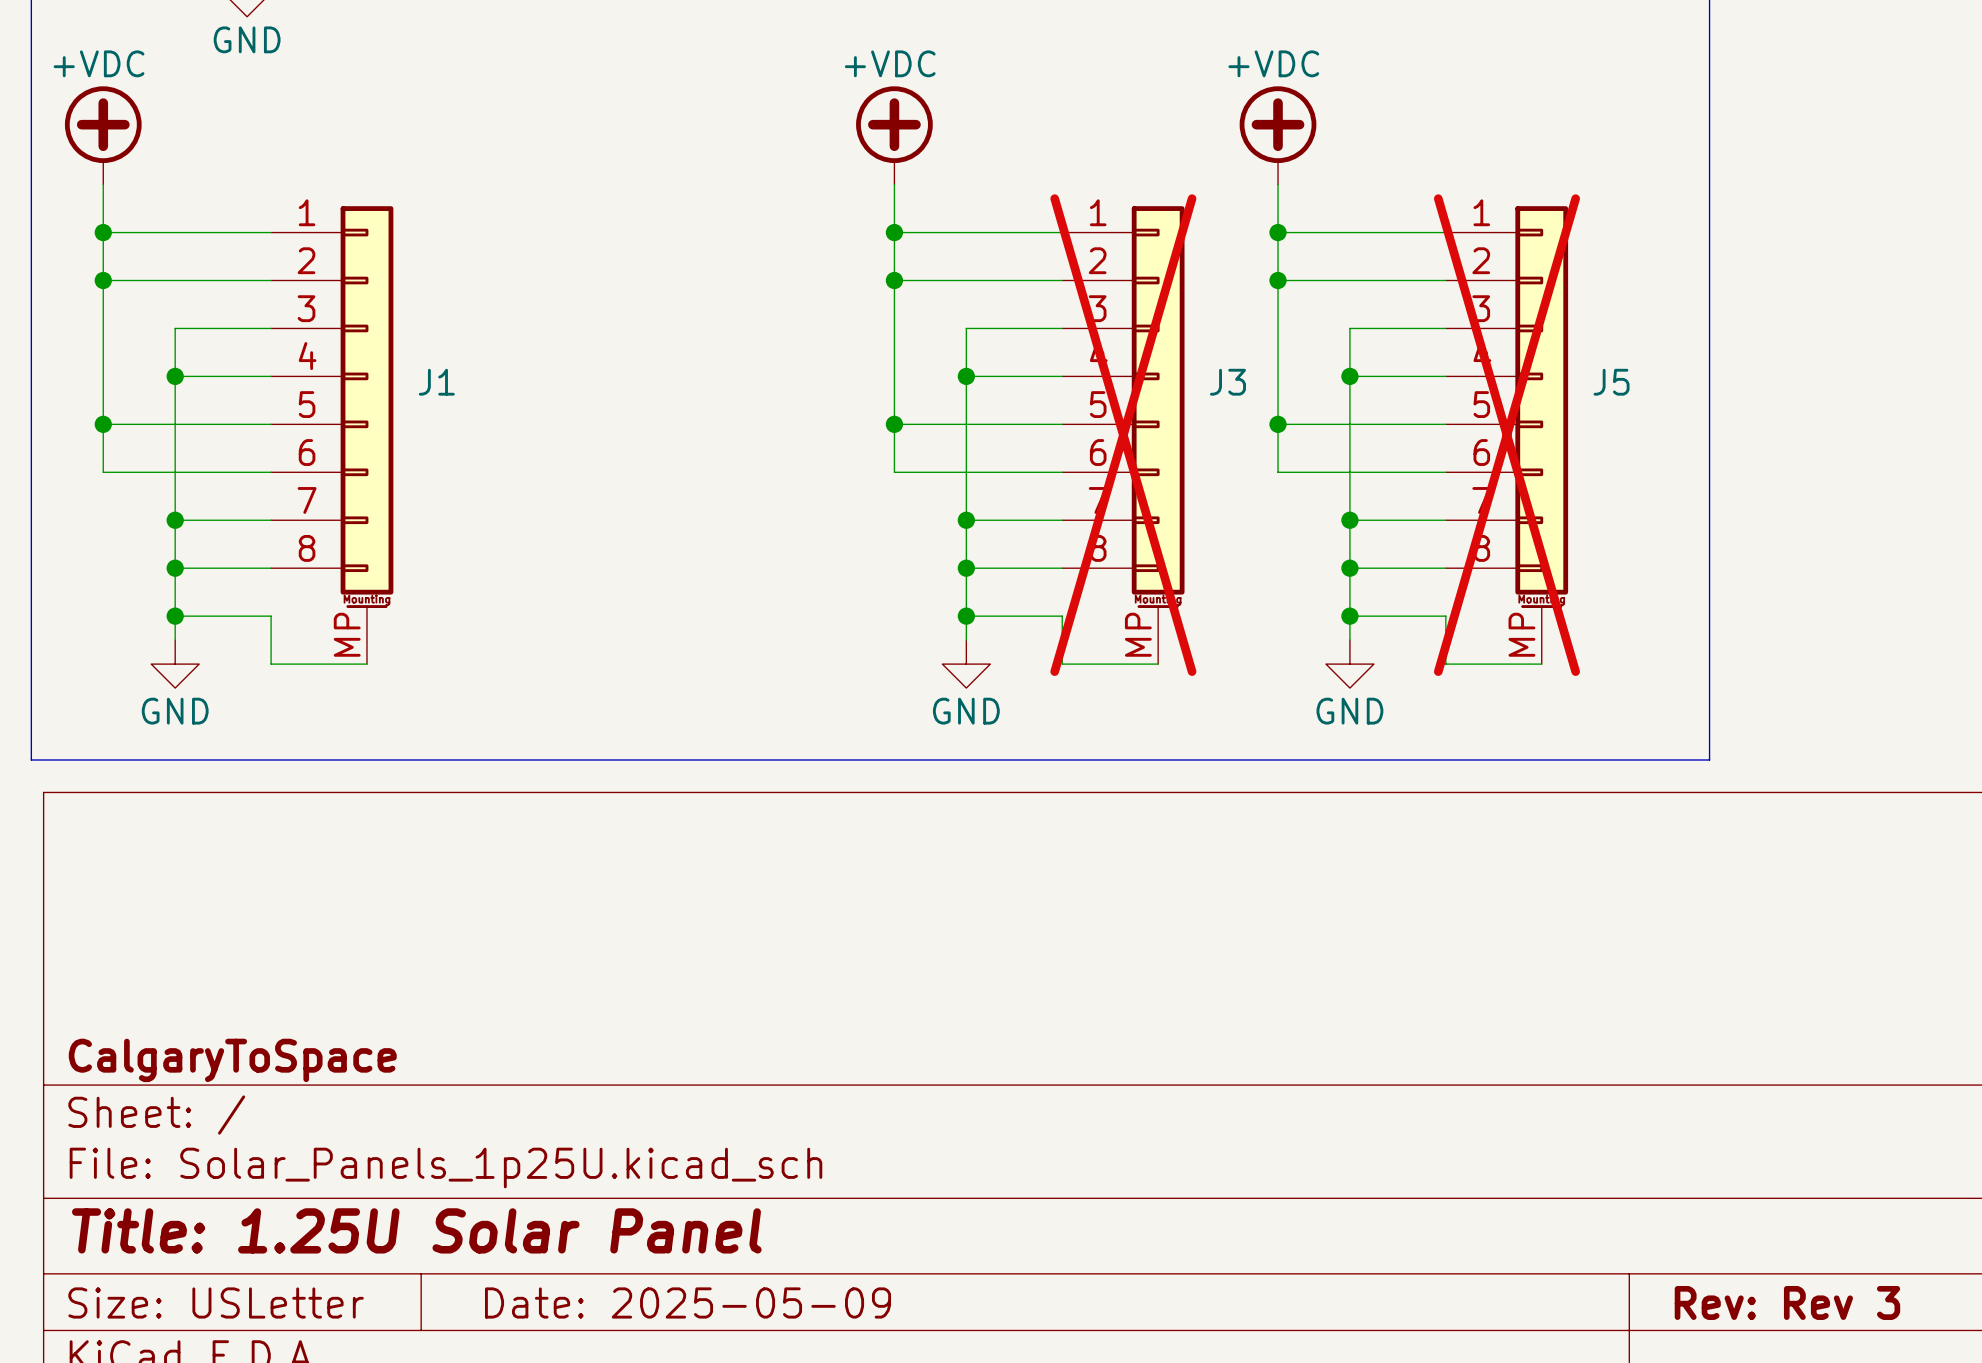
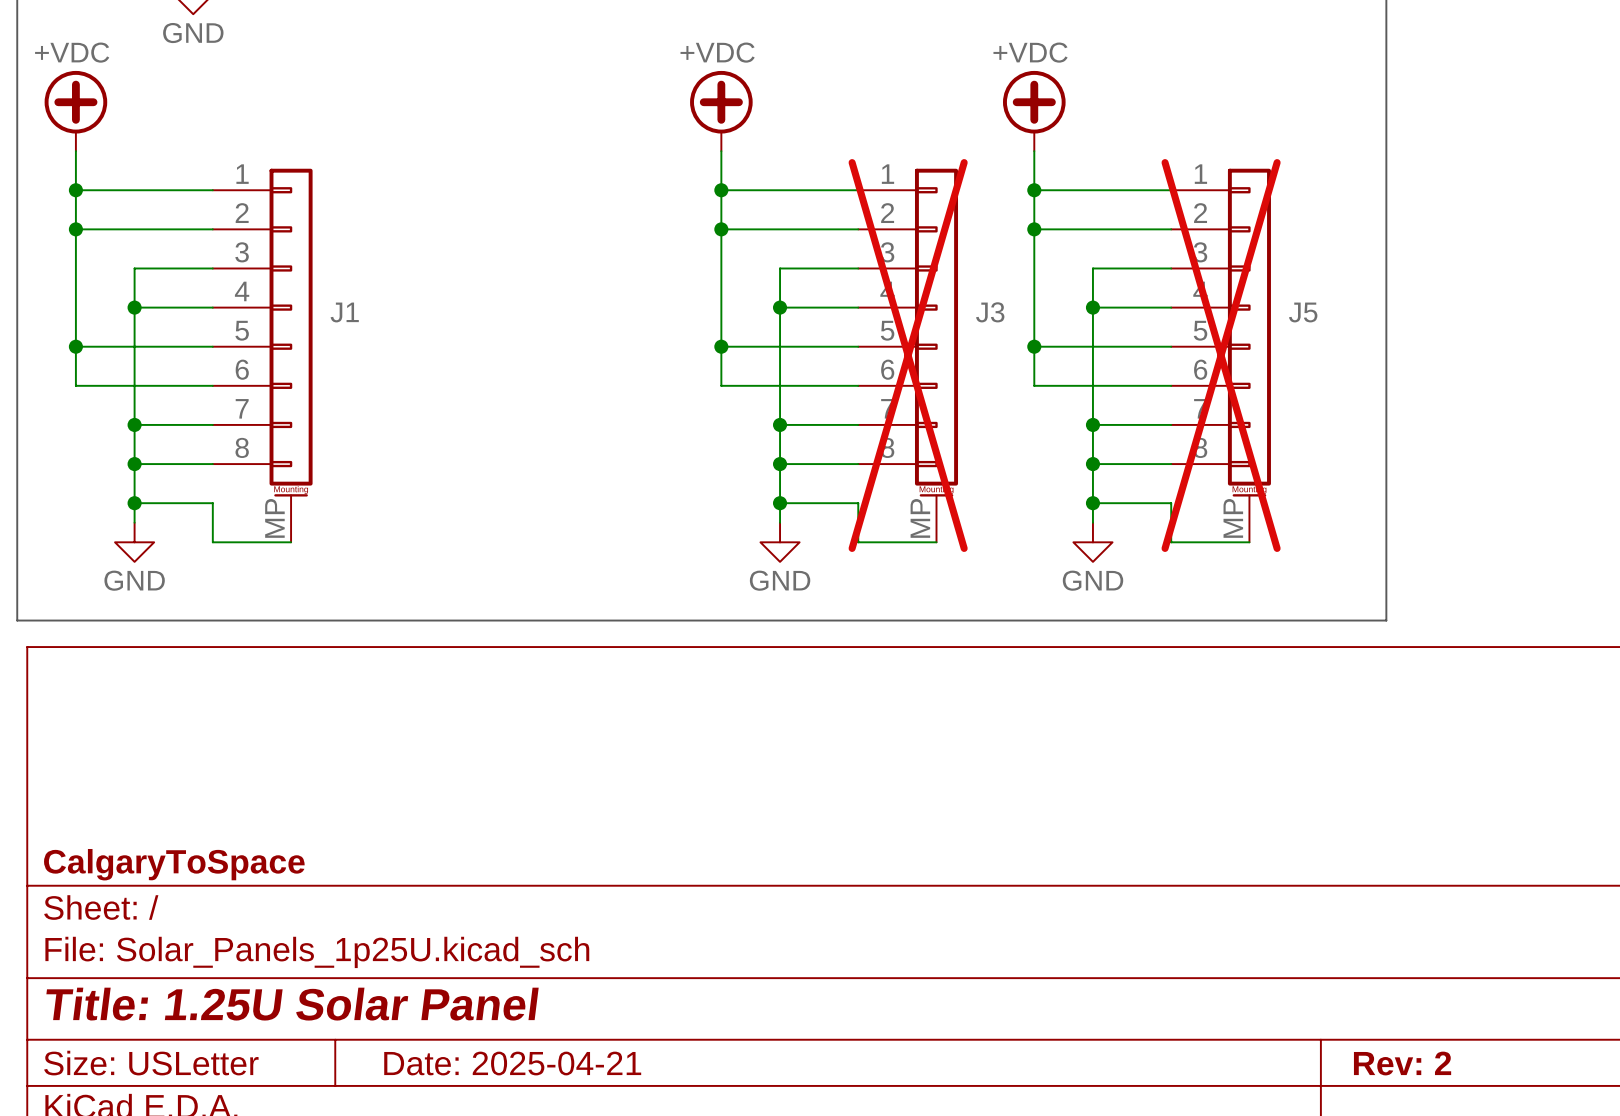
title block: Date: 2025-05-09 (688, 1302) -> Date: 2025-04-21 (512, 1063)
title block: Rev: Rev 3 (1787, 1302) -> Rev: 2 (1402, 1063)

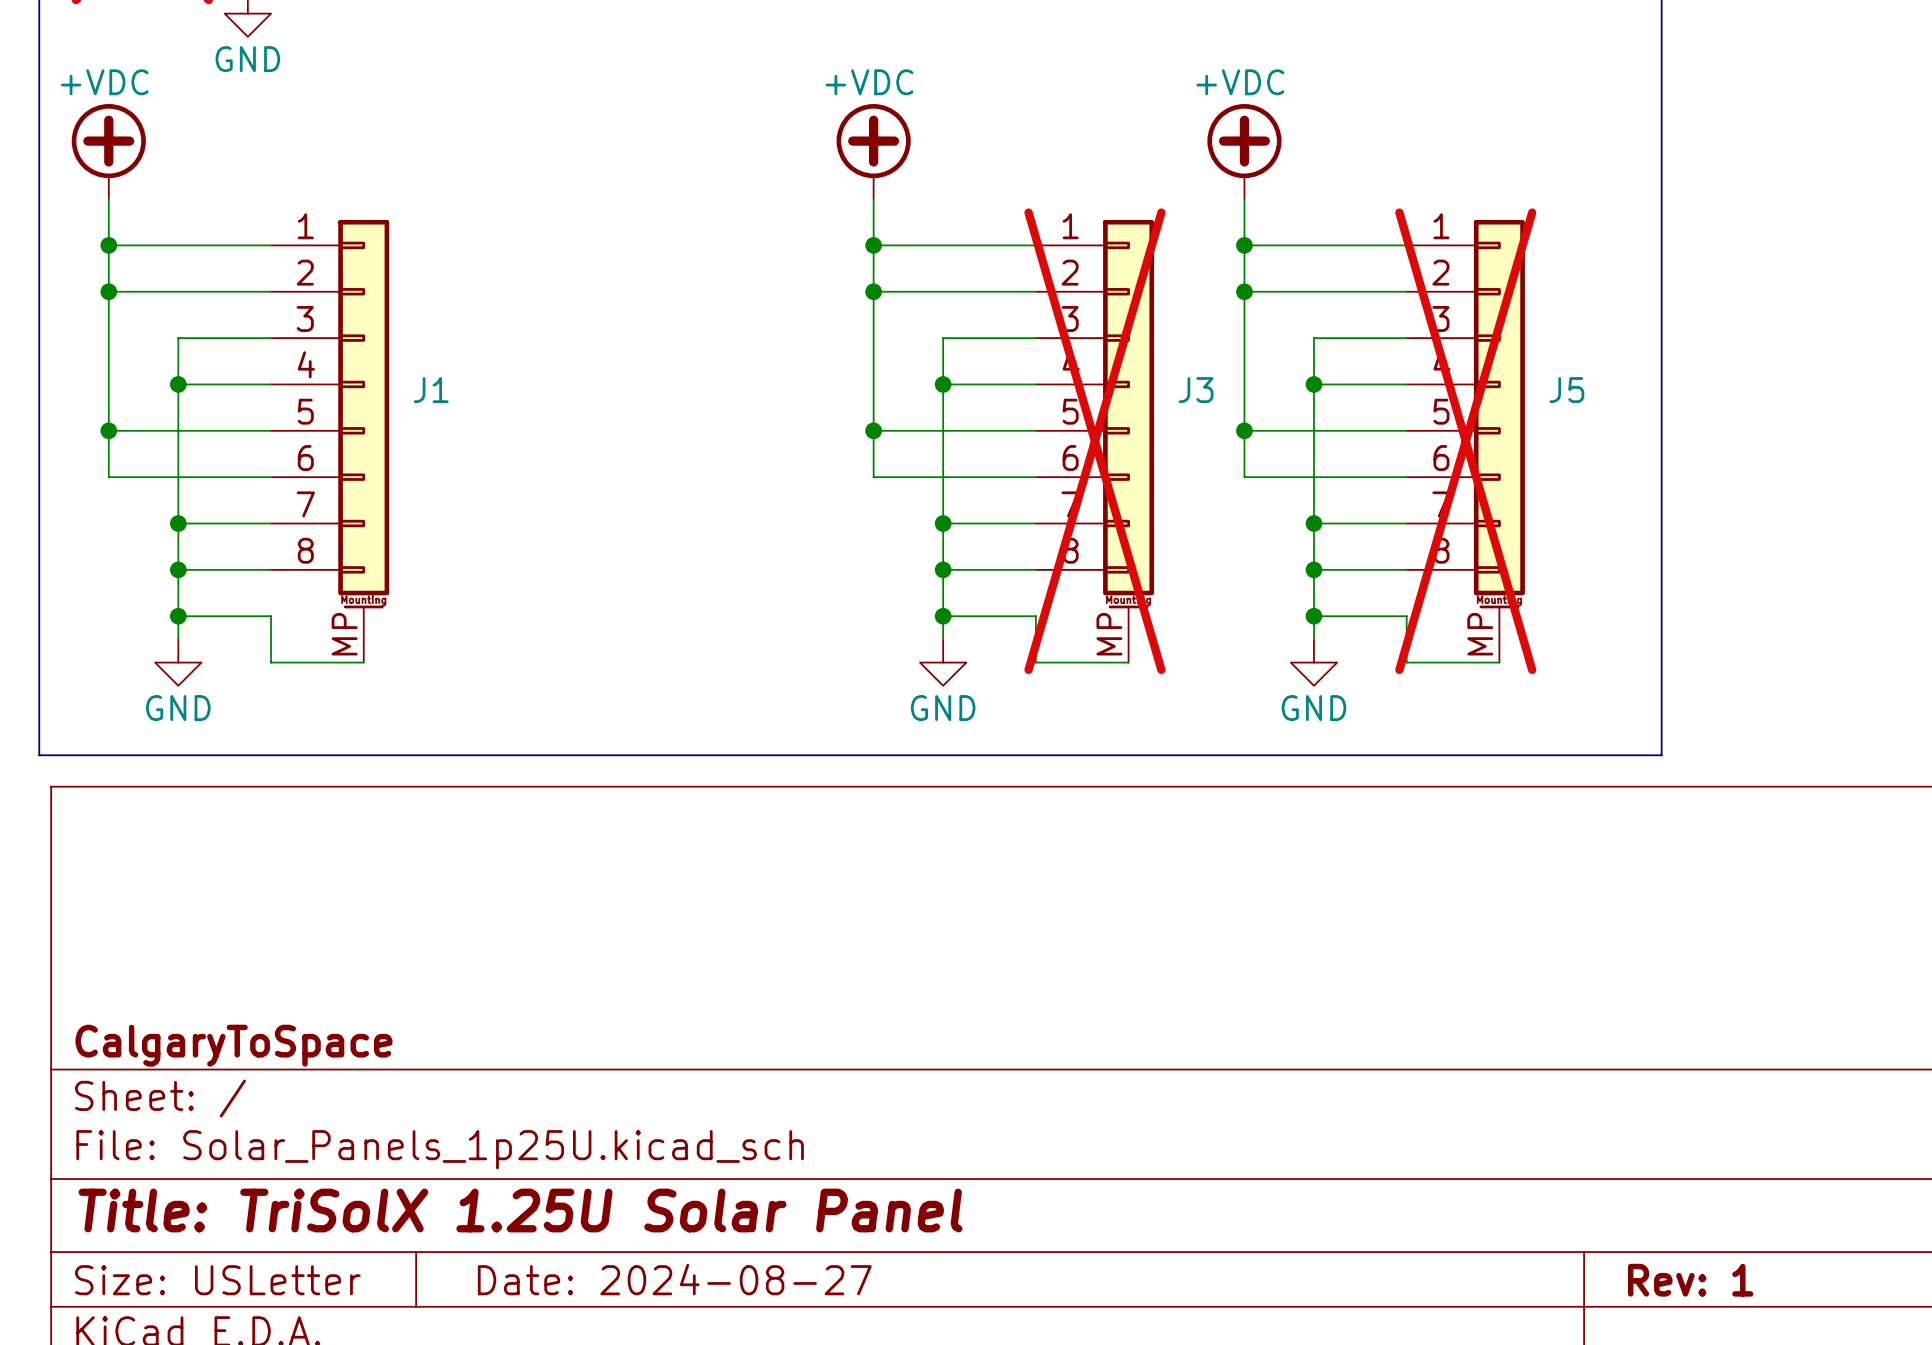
title block: Title: 1.25U Solar Panel (292, 1004) -> Title: TriSolX 1.25U Solar Panel (520, 1210)
title block: Date: 2025-04-21 (512, 1063) -> Date: 2024-08-27 (674, 1279)
title block: Rev: 2 (1402, 1063) -> Rev: 1 (1690, 1280)

